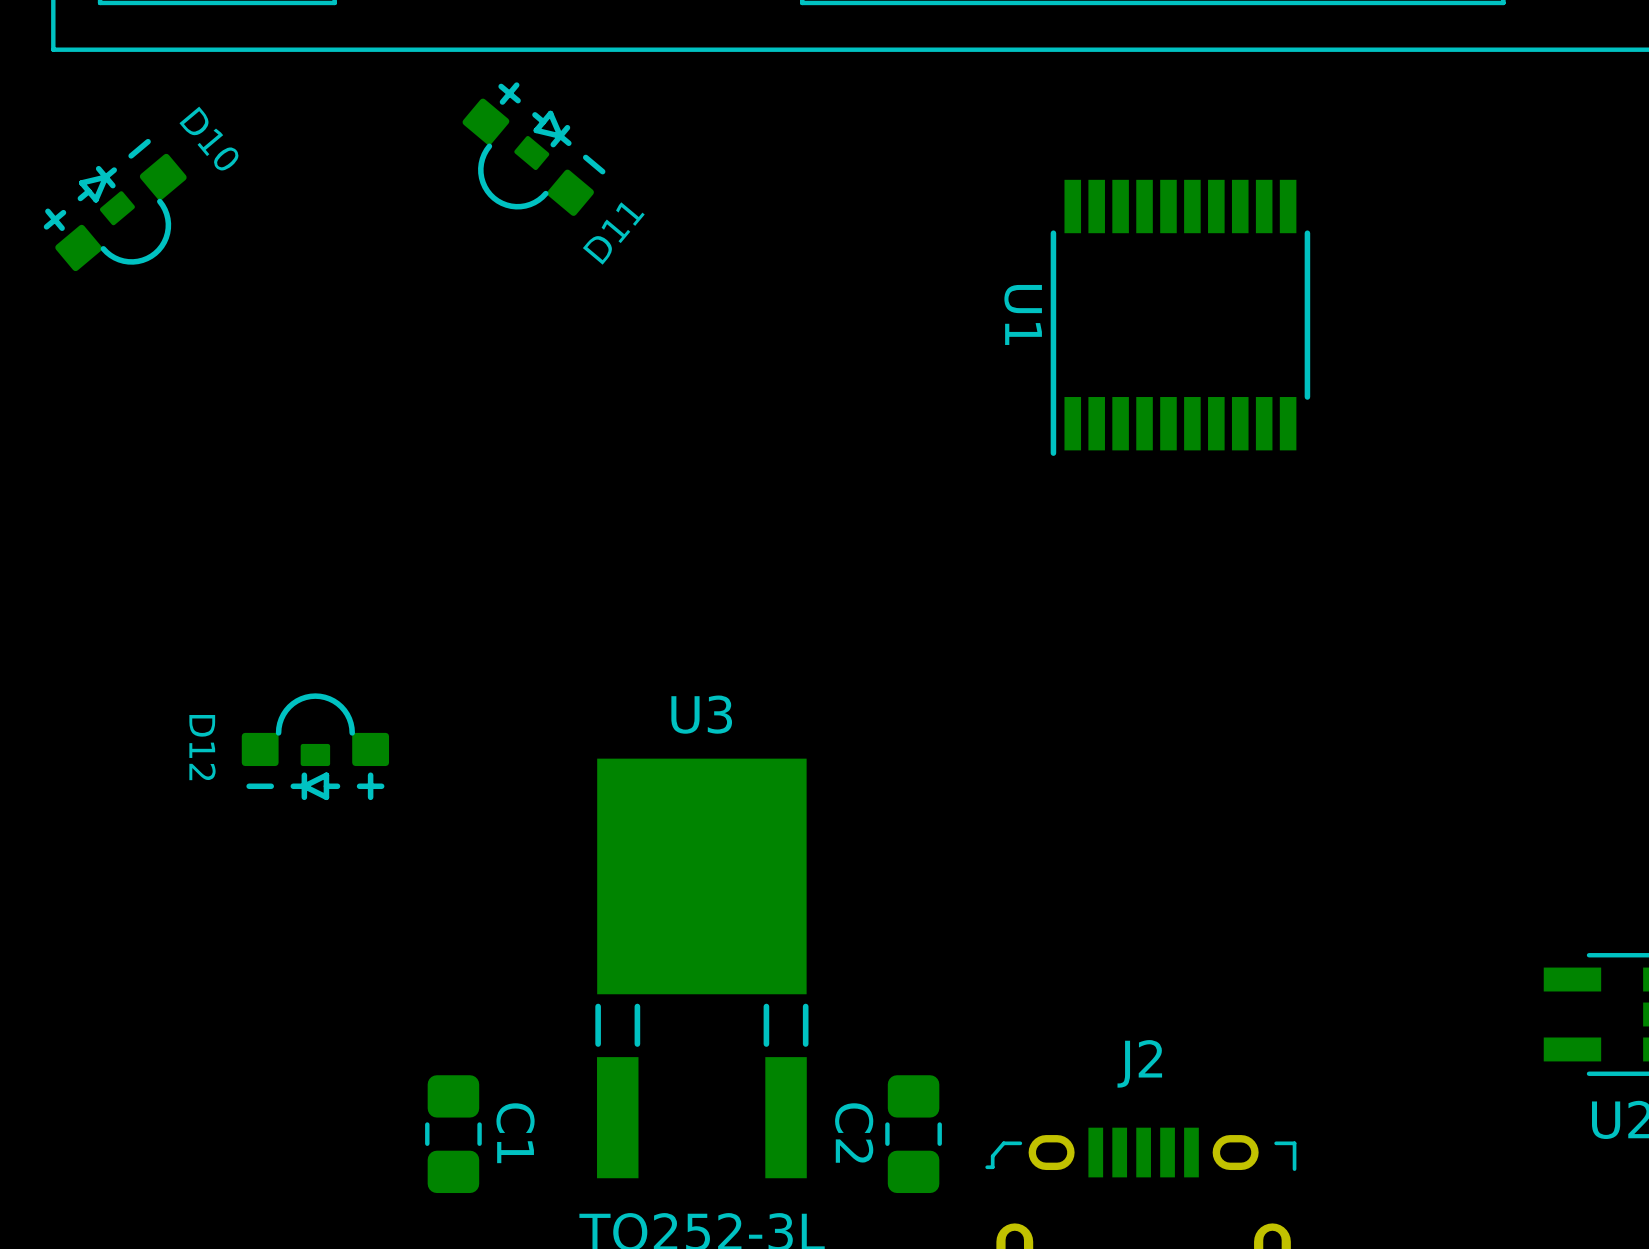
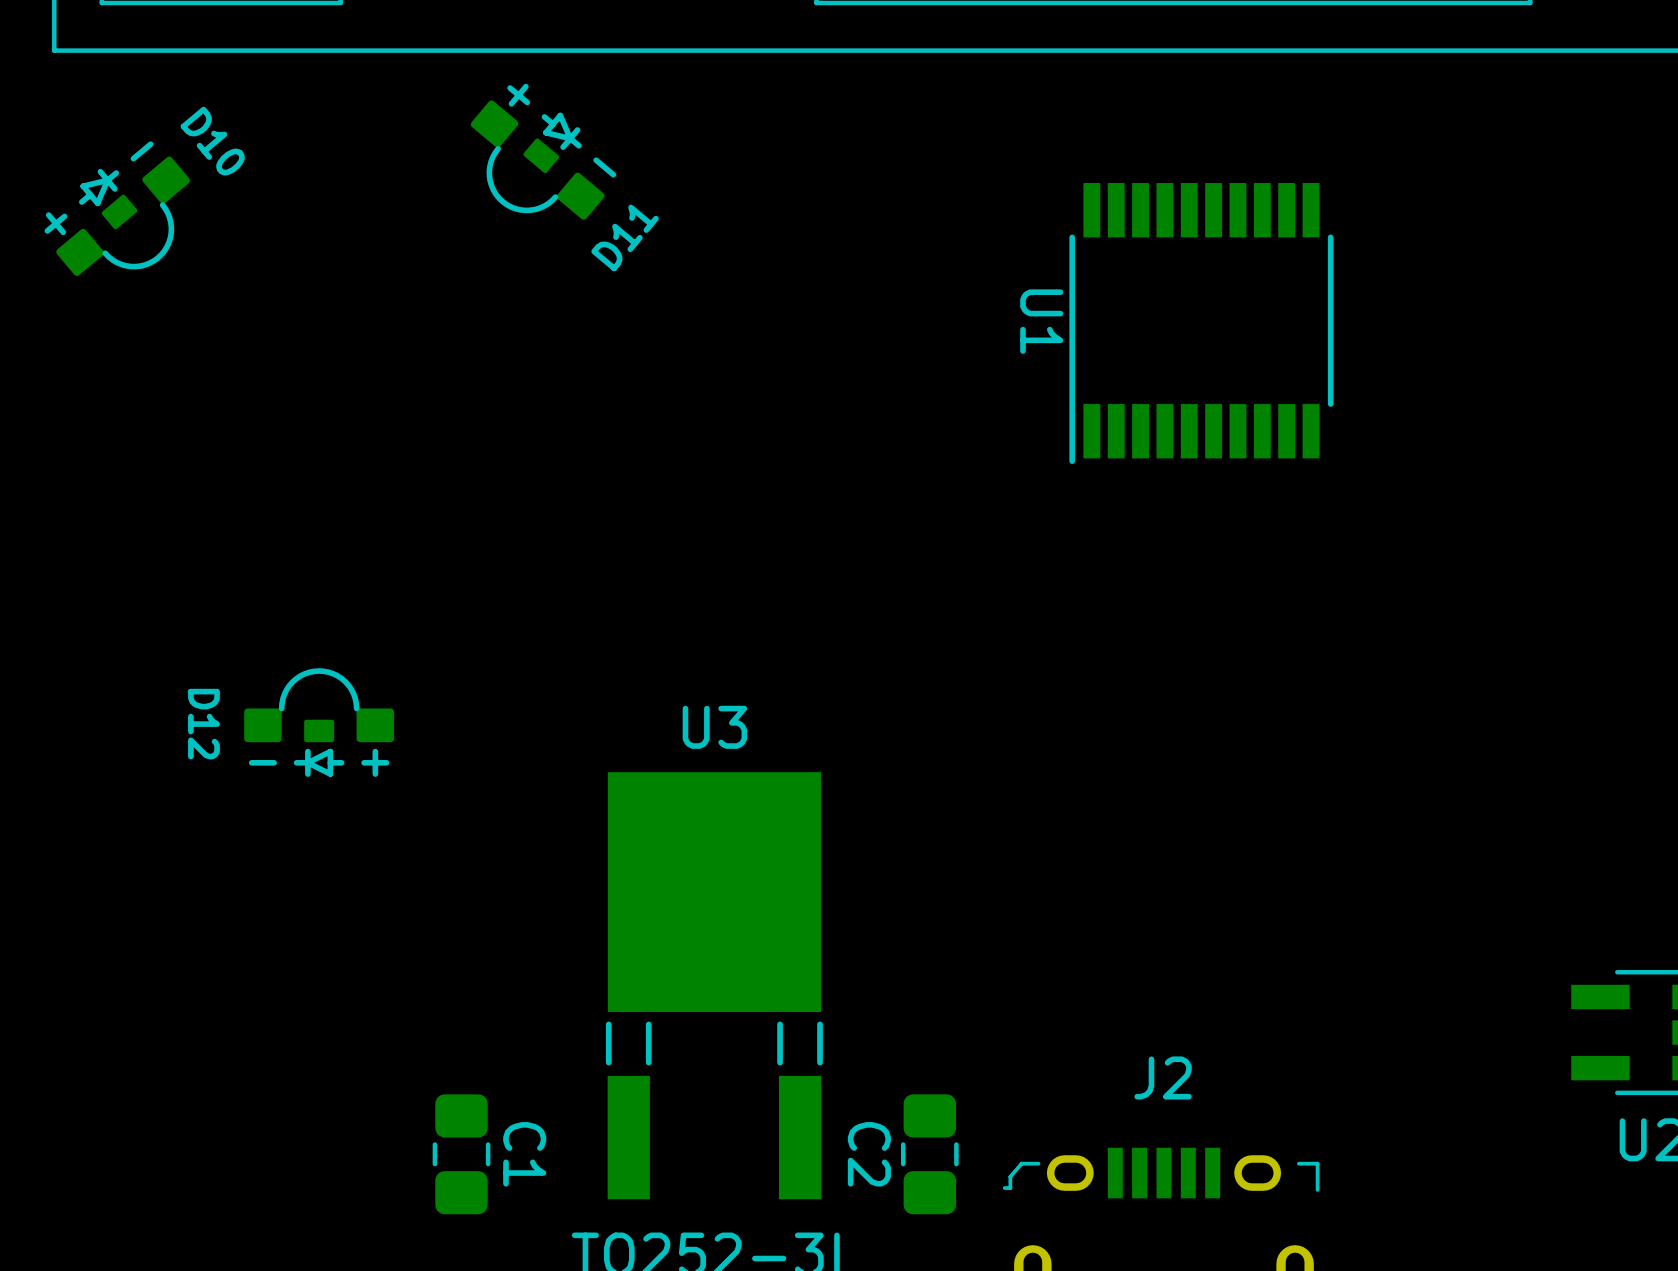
D12 position: (315, 746) -> (319, 722)

